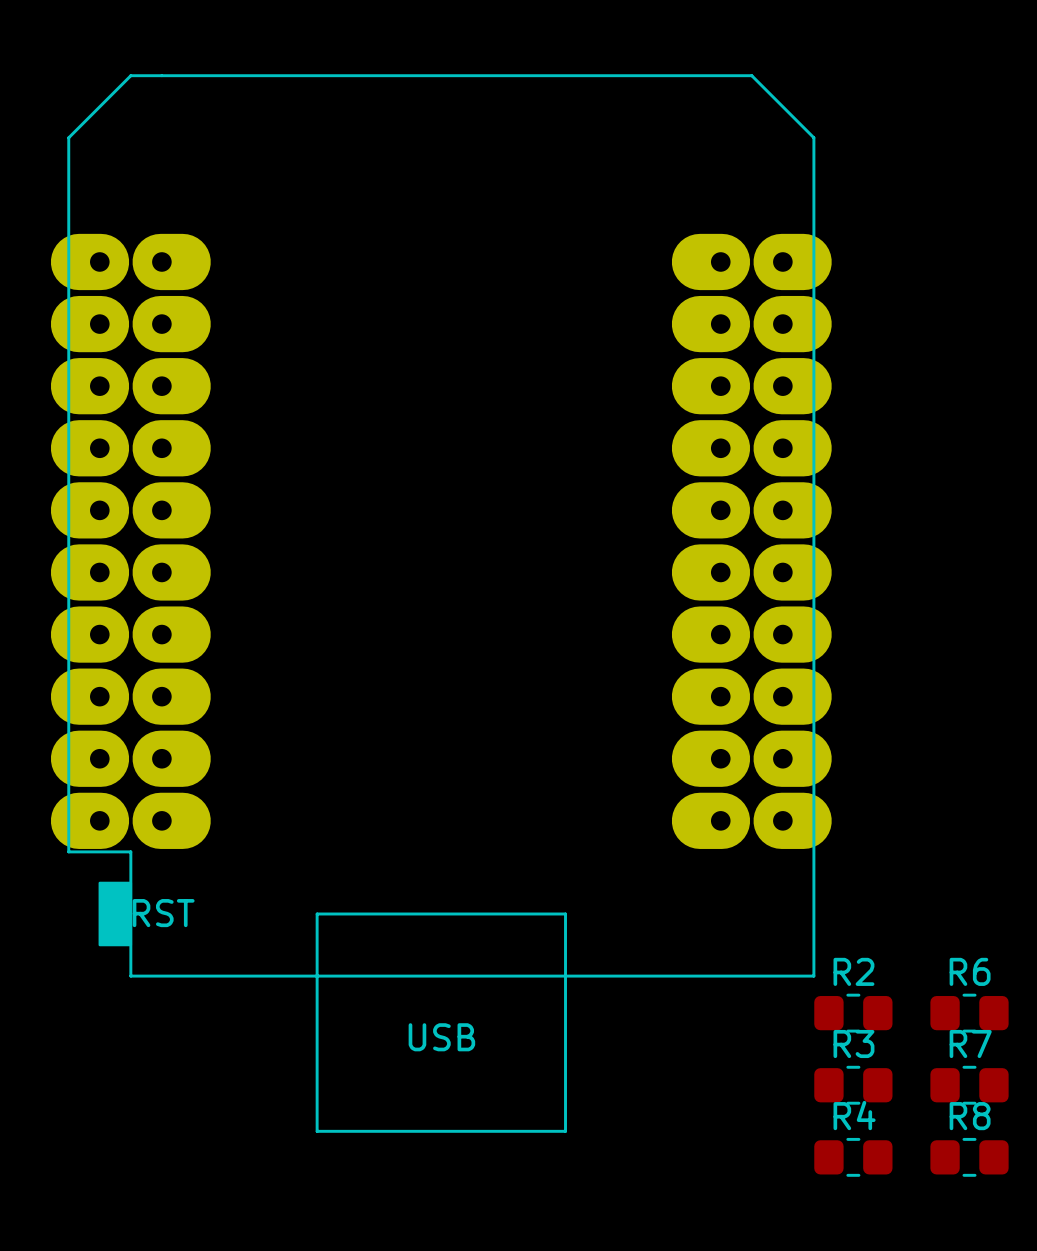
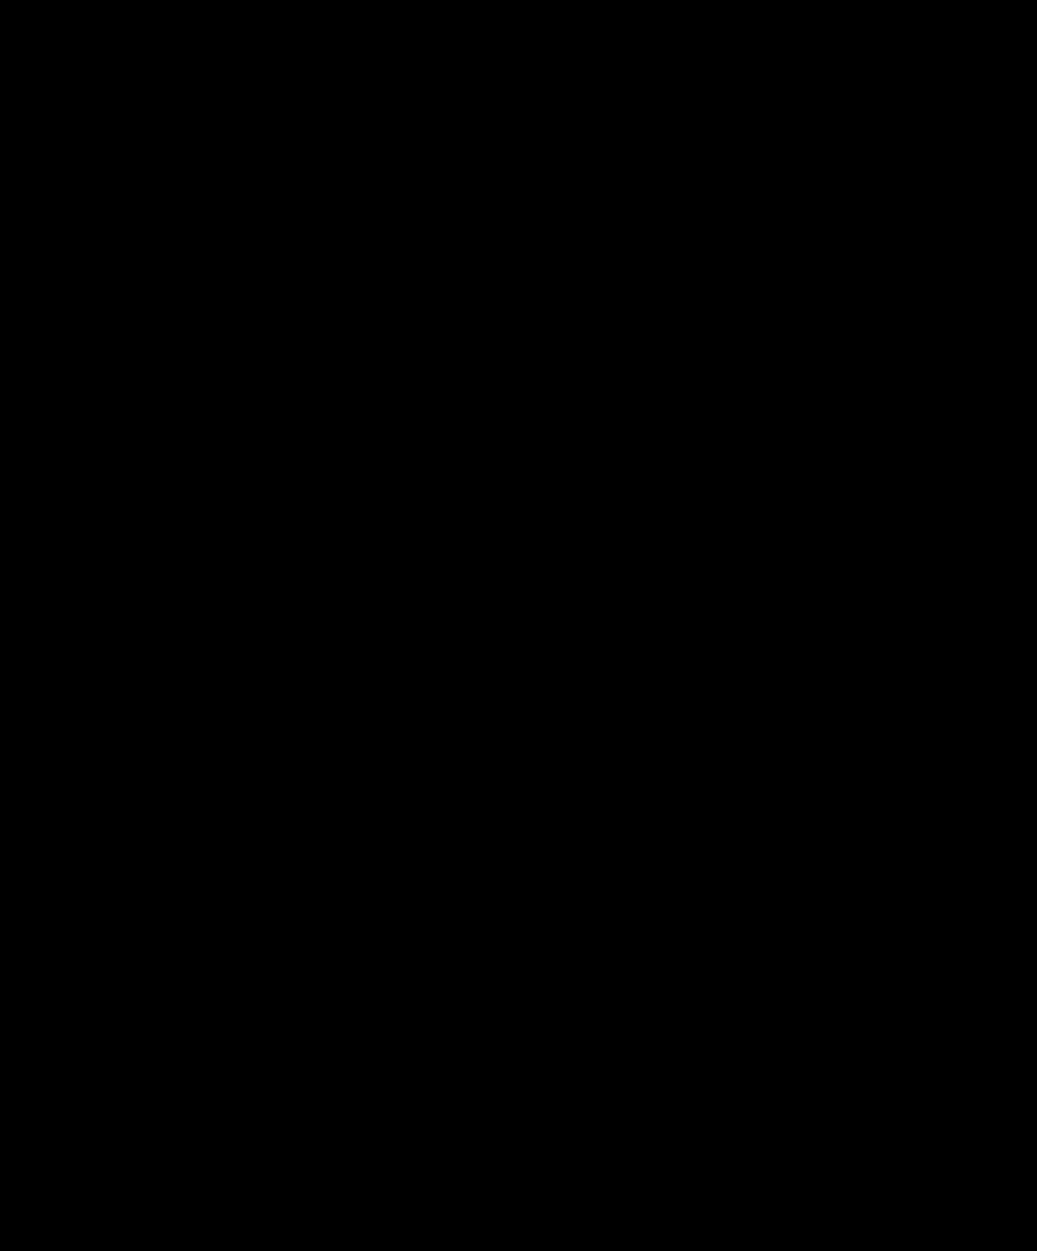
part: (441, 603) -> none
R2: (853, 1013) -> none
R6: (969, 1013) -> none
R3: (853, 1085) -> none
R7: (969, 1085) -> none
R4: (853, 1157) -> none
R8: (969, 1157) -> none

